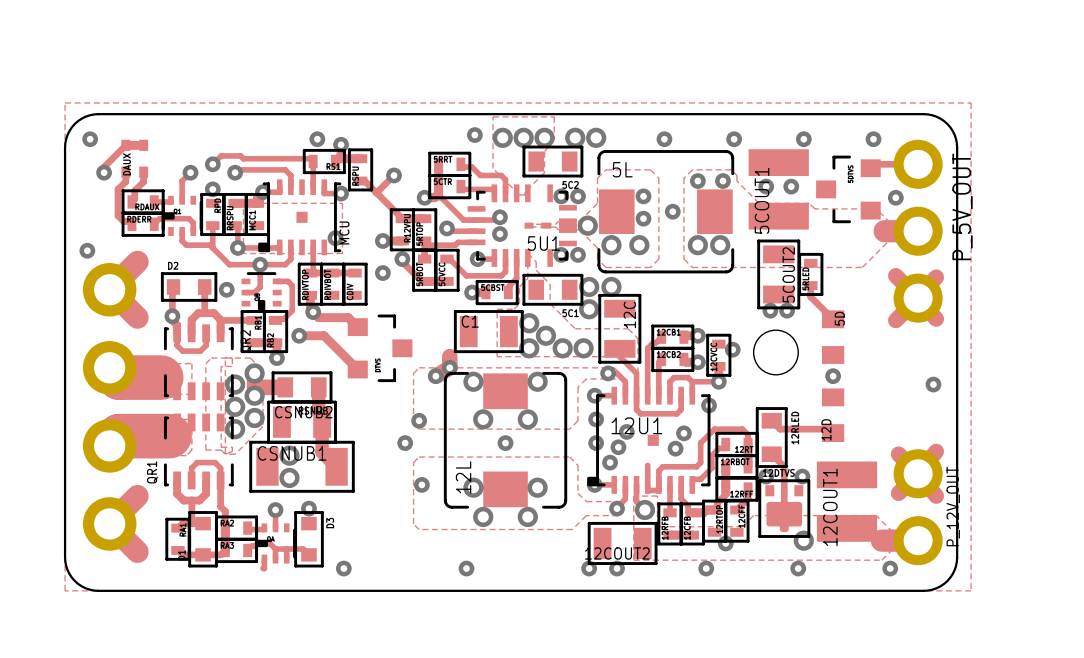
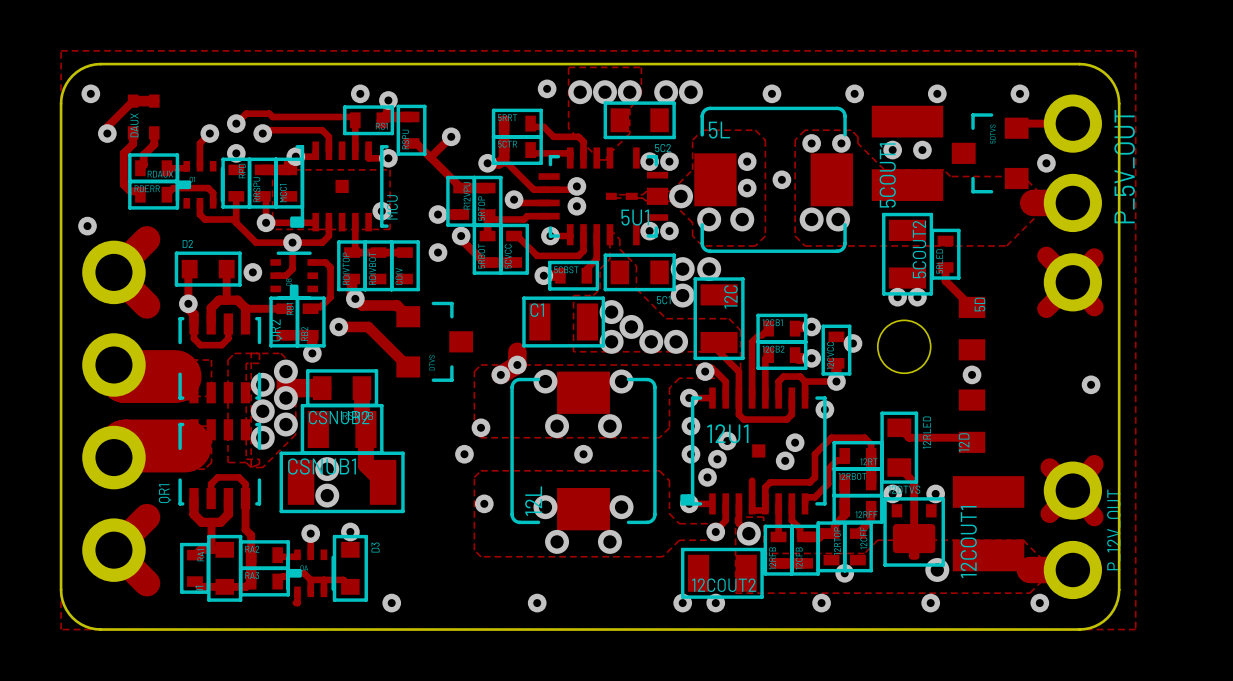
5L footprint: [597, 150, 735, 274] -> [694, 106, 853, 253]
12L footprint: [443, 371, 568, 509] -> [510, 371, 657, 531]

